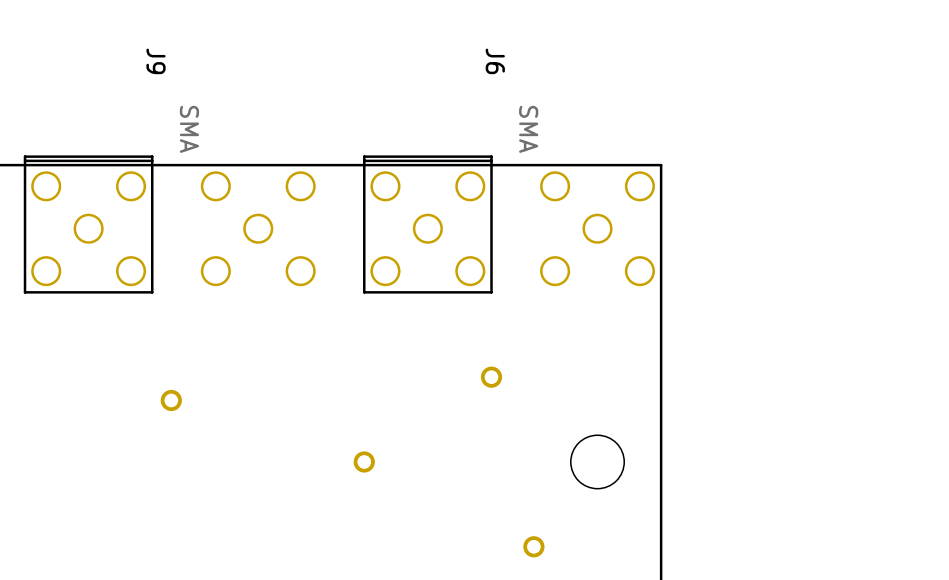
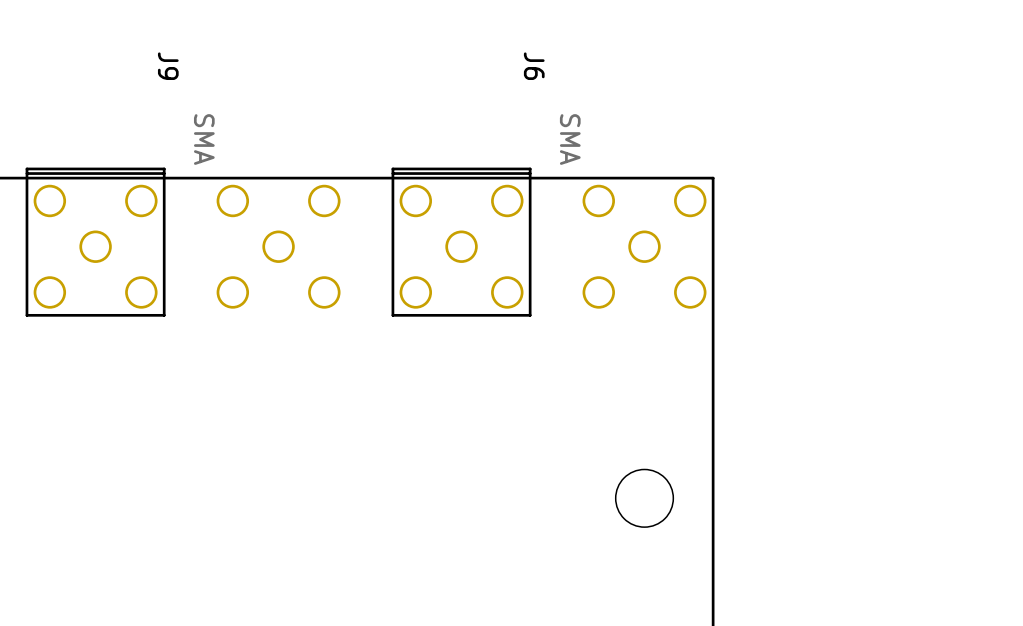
part: (491, 377) -> none
part: (171, 400) -> none
part: (364, 461) -> none
part: (533, 546) -> none

